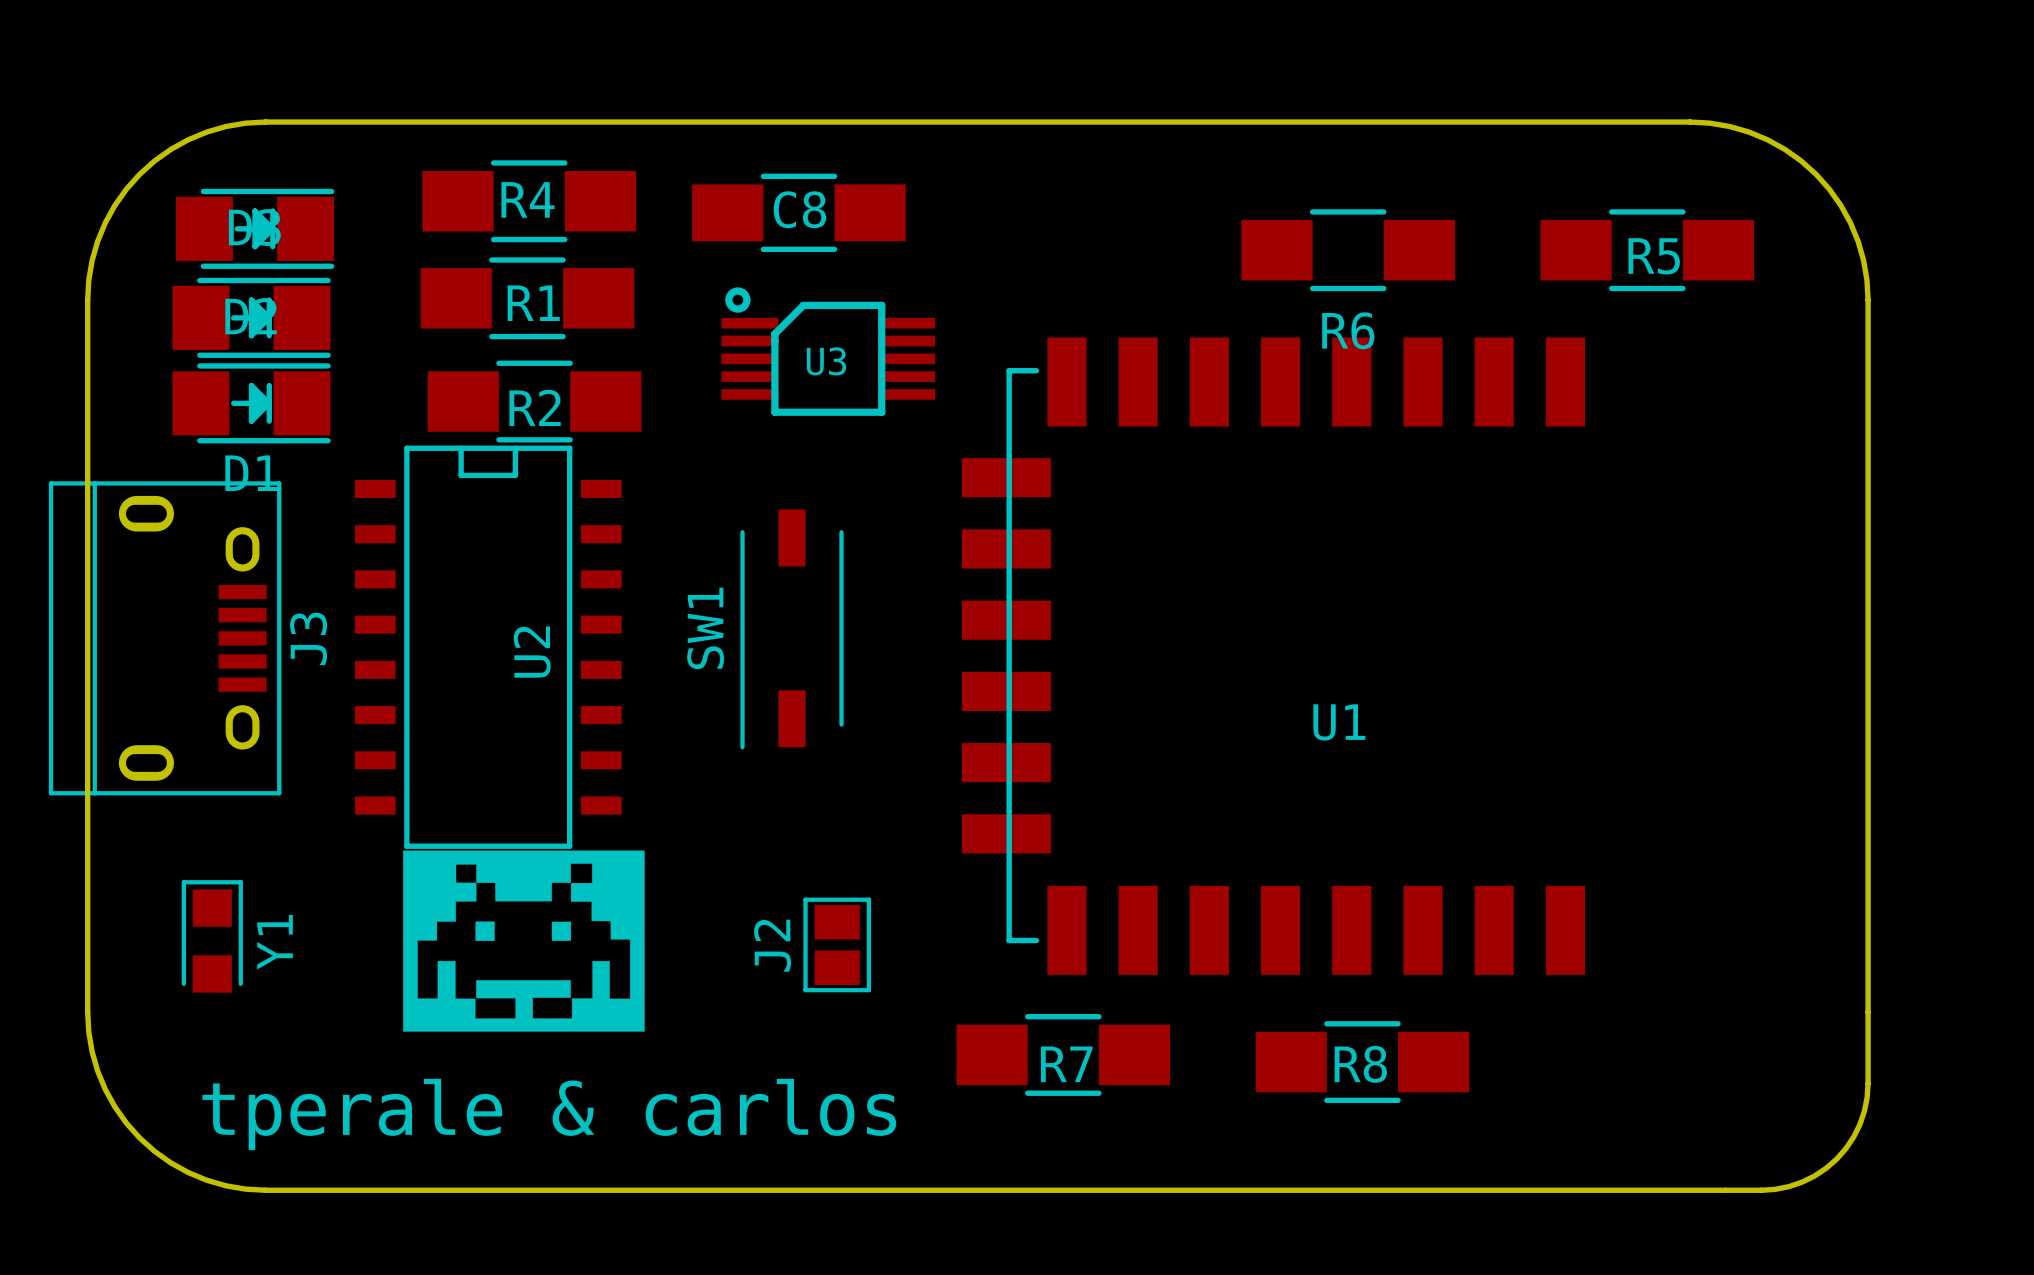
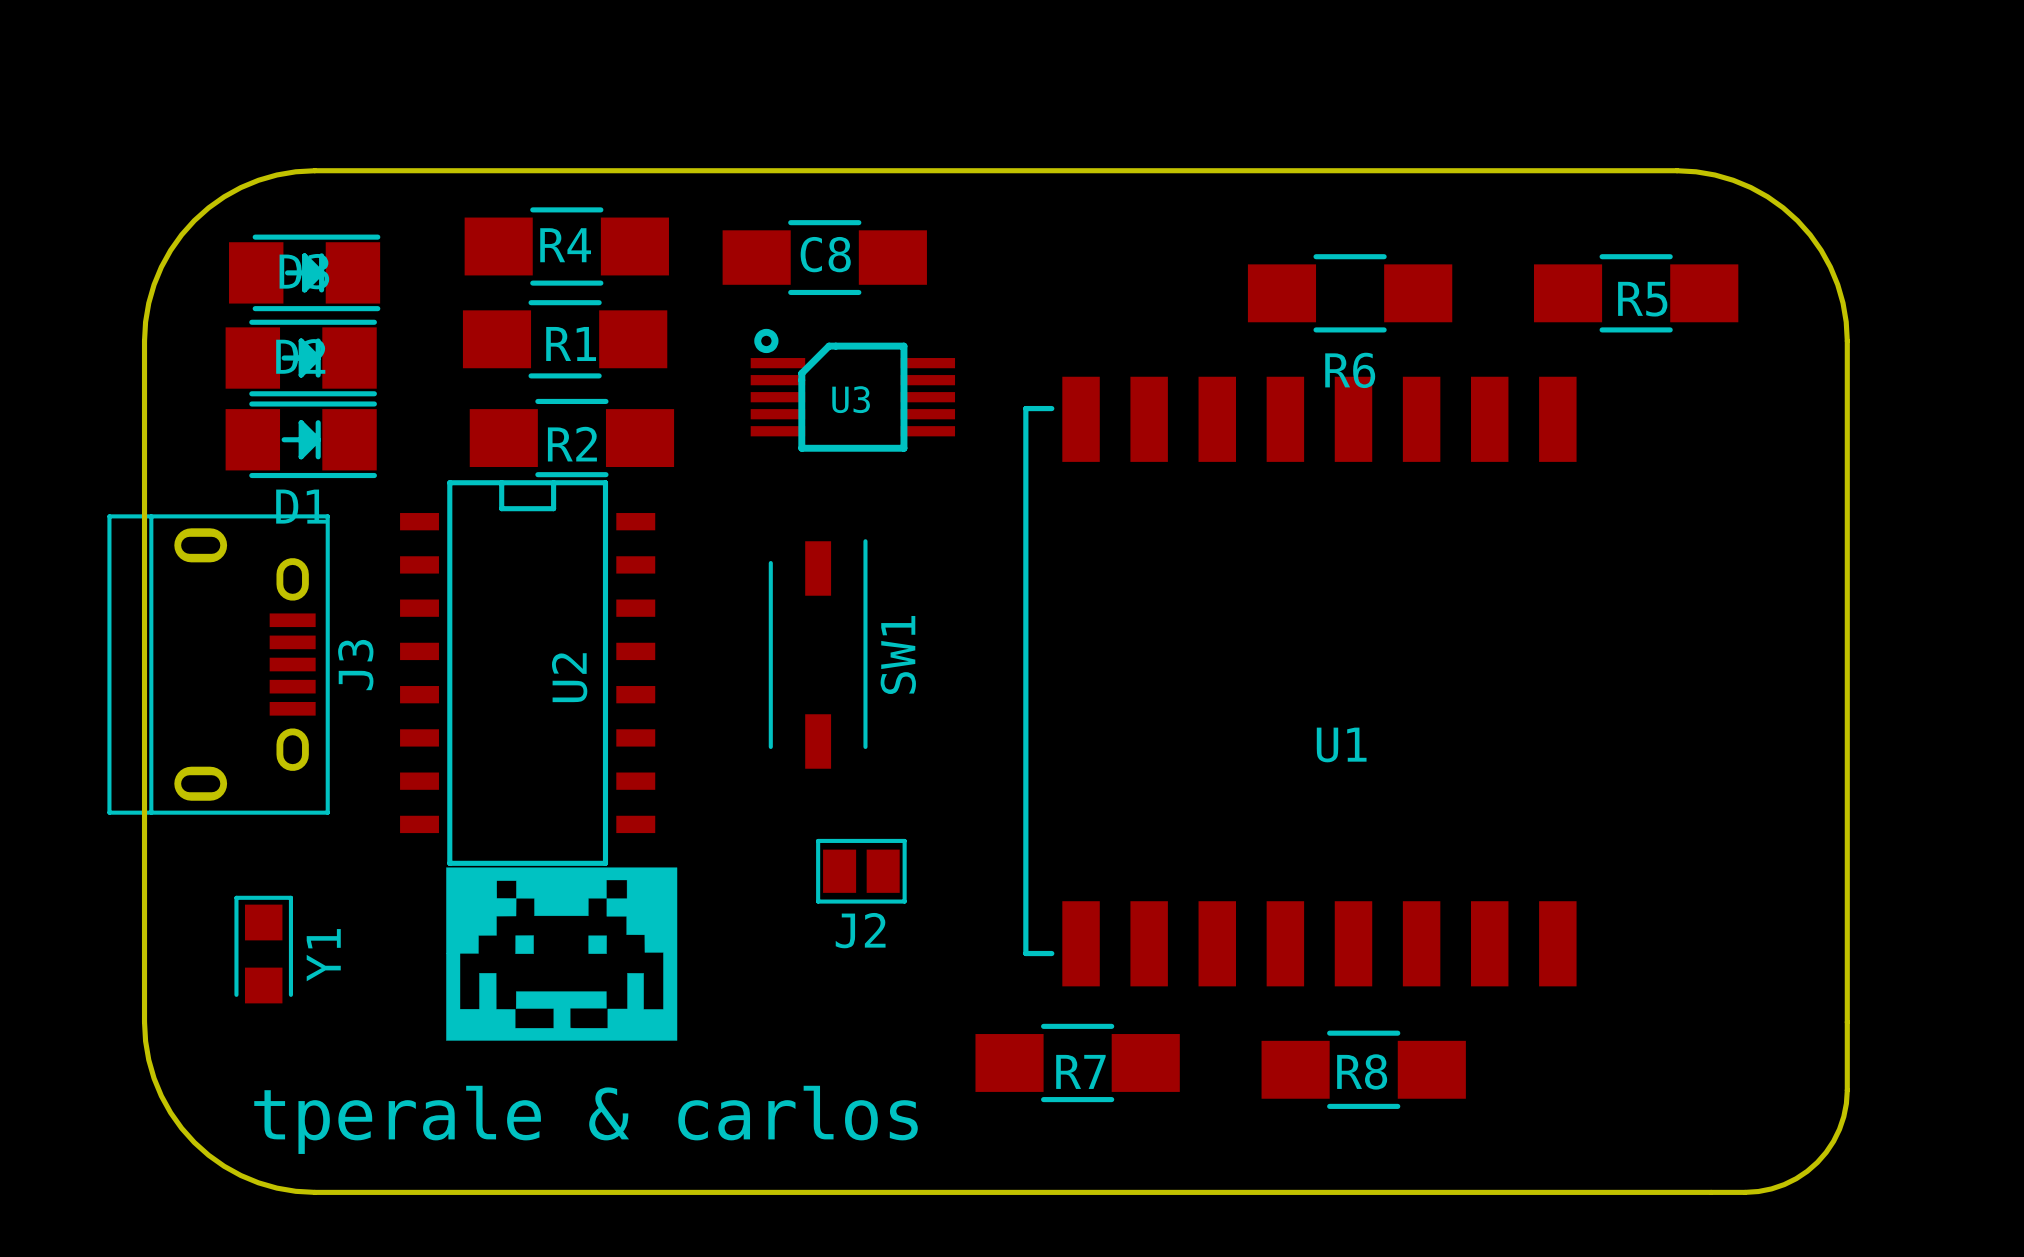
U1 footprint: [961, 337, 1586, 975] -> [1023, 376, 1577, 987]
SW1 rotation: 0° (792, 629) -> 180° (818, 653)
J2 rotation: 0° (837, 944) -> 90° clockwise (861, 871)
J2 position: (837, 944) -> (861, 871)
J2 name position: J2 (772, 945) -> J2 (860, 930)

